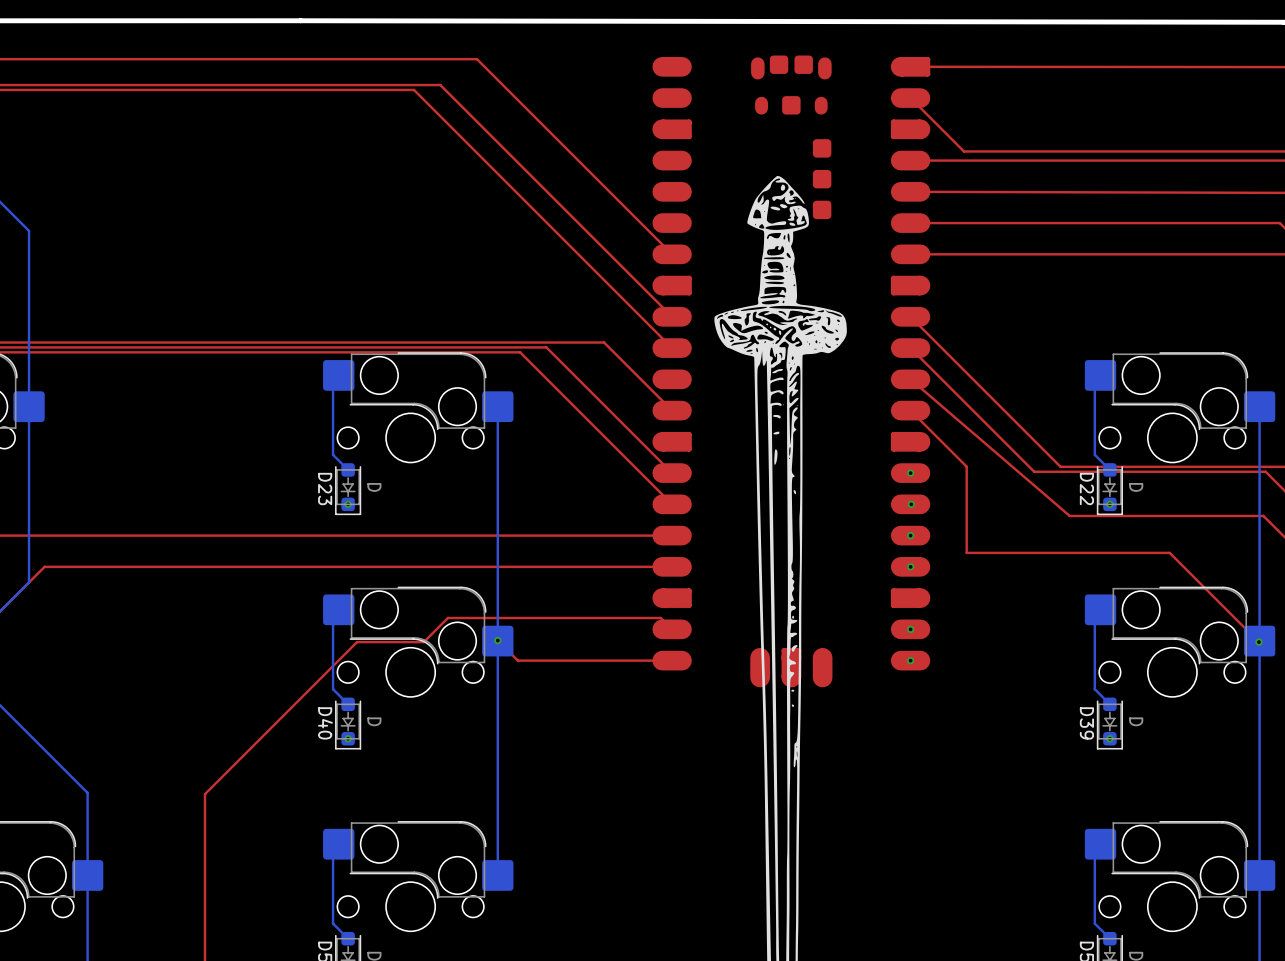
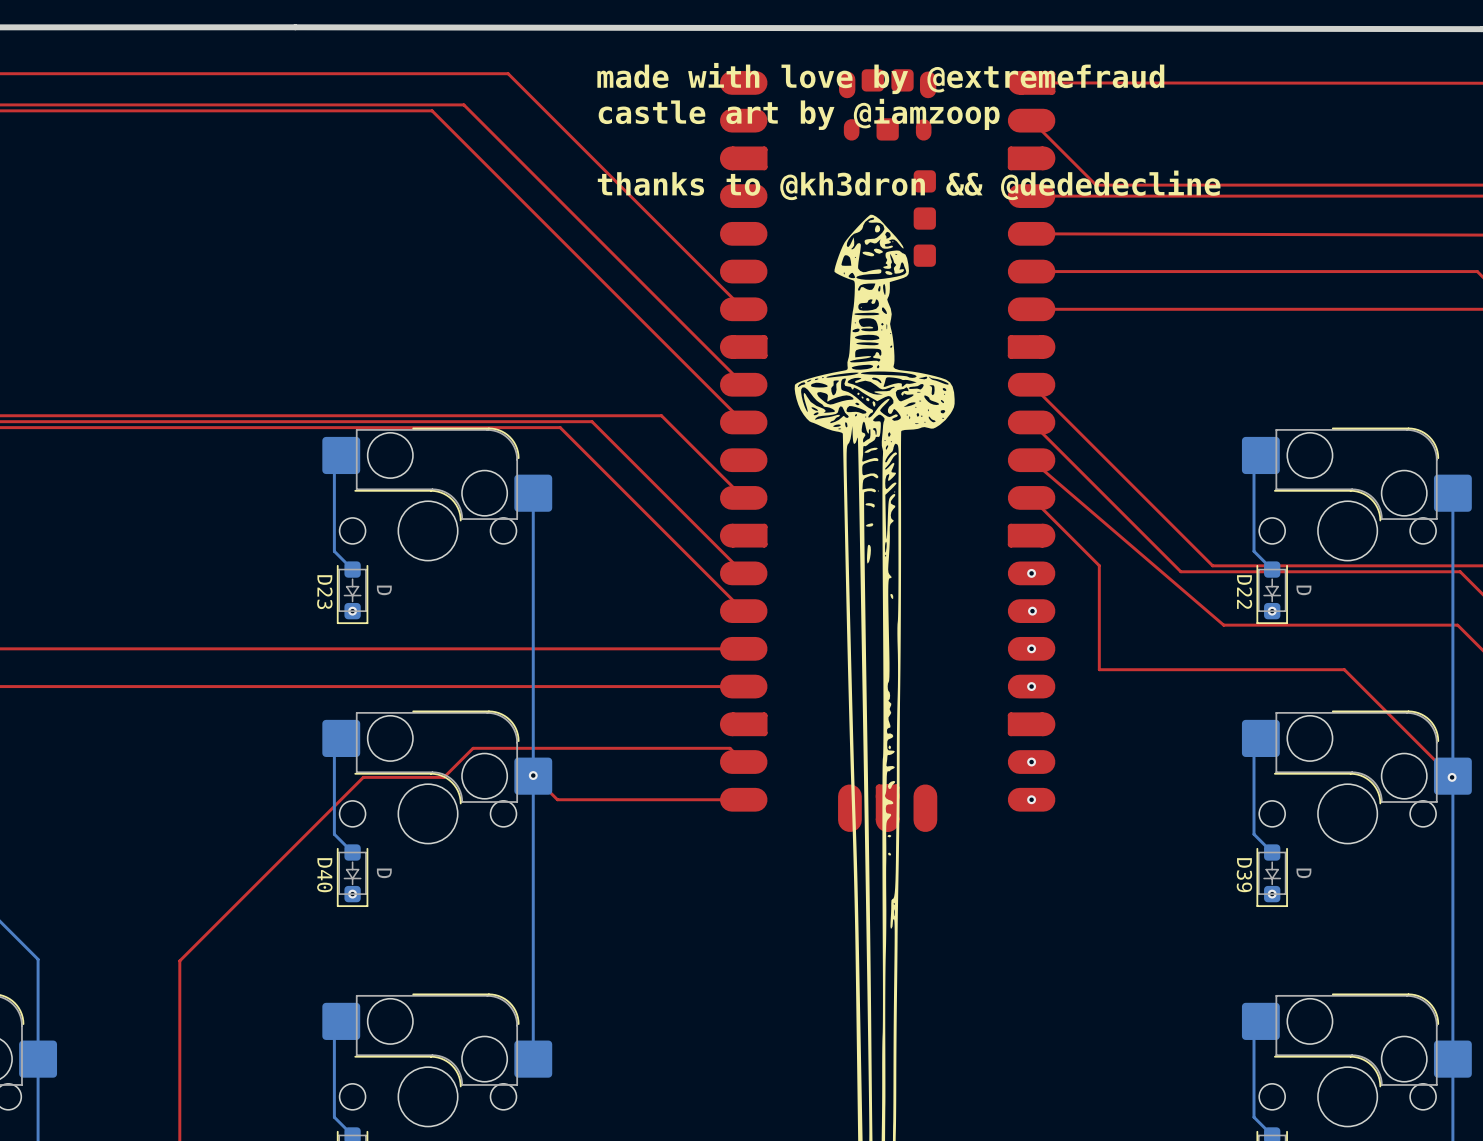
text: none -> made with love by @extremefraud (880, 78)
text: none -> castle art by @iamzoop (799, 114)
text: none -> thanks to @kh3dron && @dededecline (909, 185)

